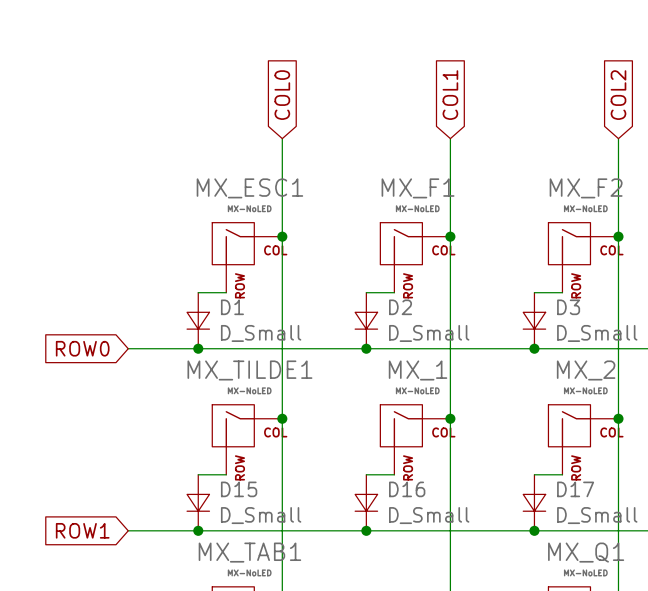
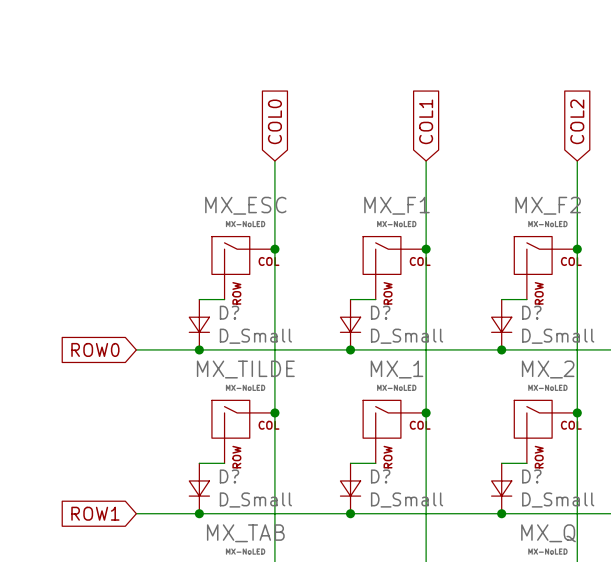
MX_ESC1 name: MX_ESC1 (249, 188) -> MX_ESC (245, 205)
D1 name: D1 (232, 307) -> D? (229, 312)
D2 name: D2 (400, 307) -> D? (380, 312)
D3 name: D3 (568, 307) -> D? (531, 312)
MX_TILDE1 name: MX_TILDE1 (249, 370) -> MX_TILDE (245, 369)
D15 name: D15 (239, 489) -> D? (229, 476)
D16 name: D16 (407, 489) -> D? (380, 476)
D17 name: D17 (575, 489) -> D? (531, 476)
MX_TAB1 name: MX_TAB1 (249, 552) -> MX_TAB (245, 533)
MX_Q1 name: MX_Q1 (586, 552) -> MX_Q (548, 533)

